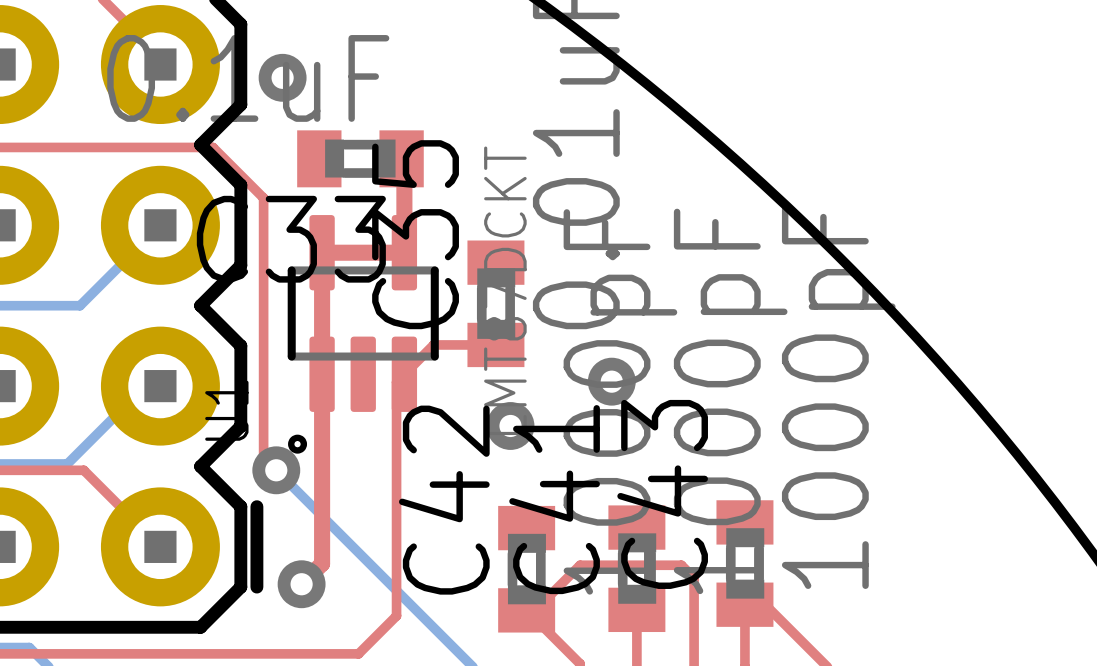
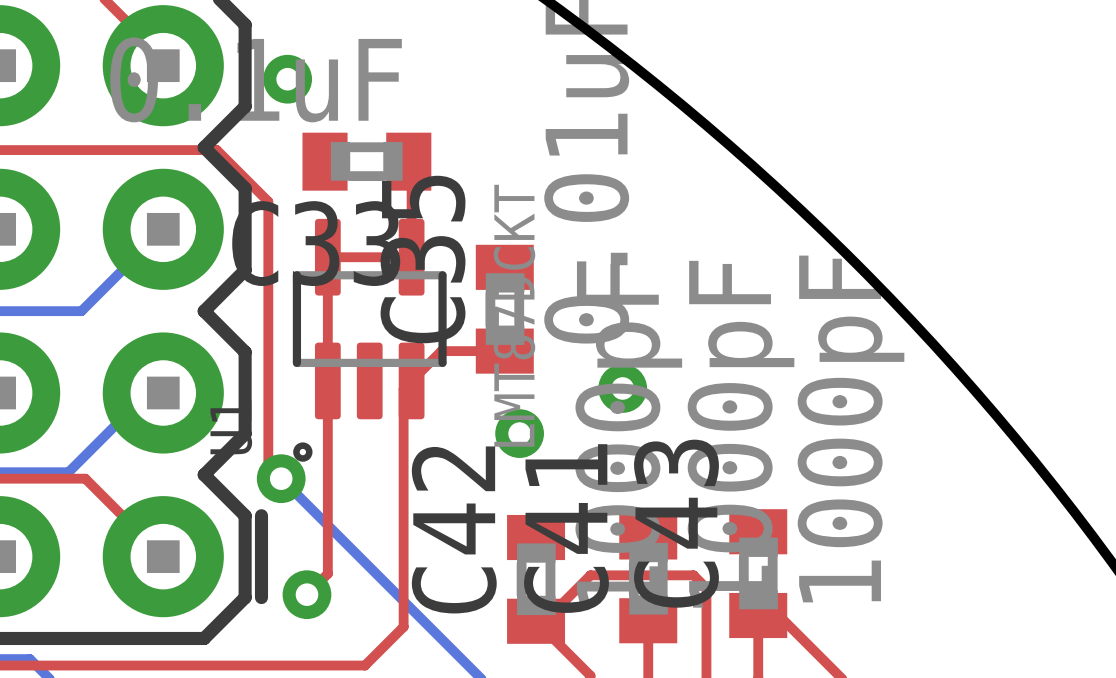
top track width: thick (404, 161) (404, 252) (322, 252) (322, 563) (301, 584) -> thin (411, 164) (411, 257) (327, 257) (327, 573) (306, 594)

